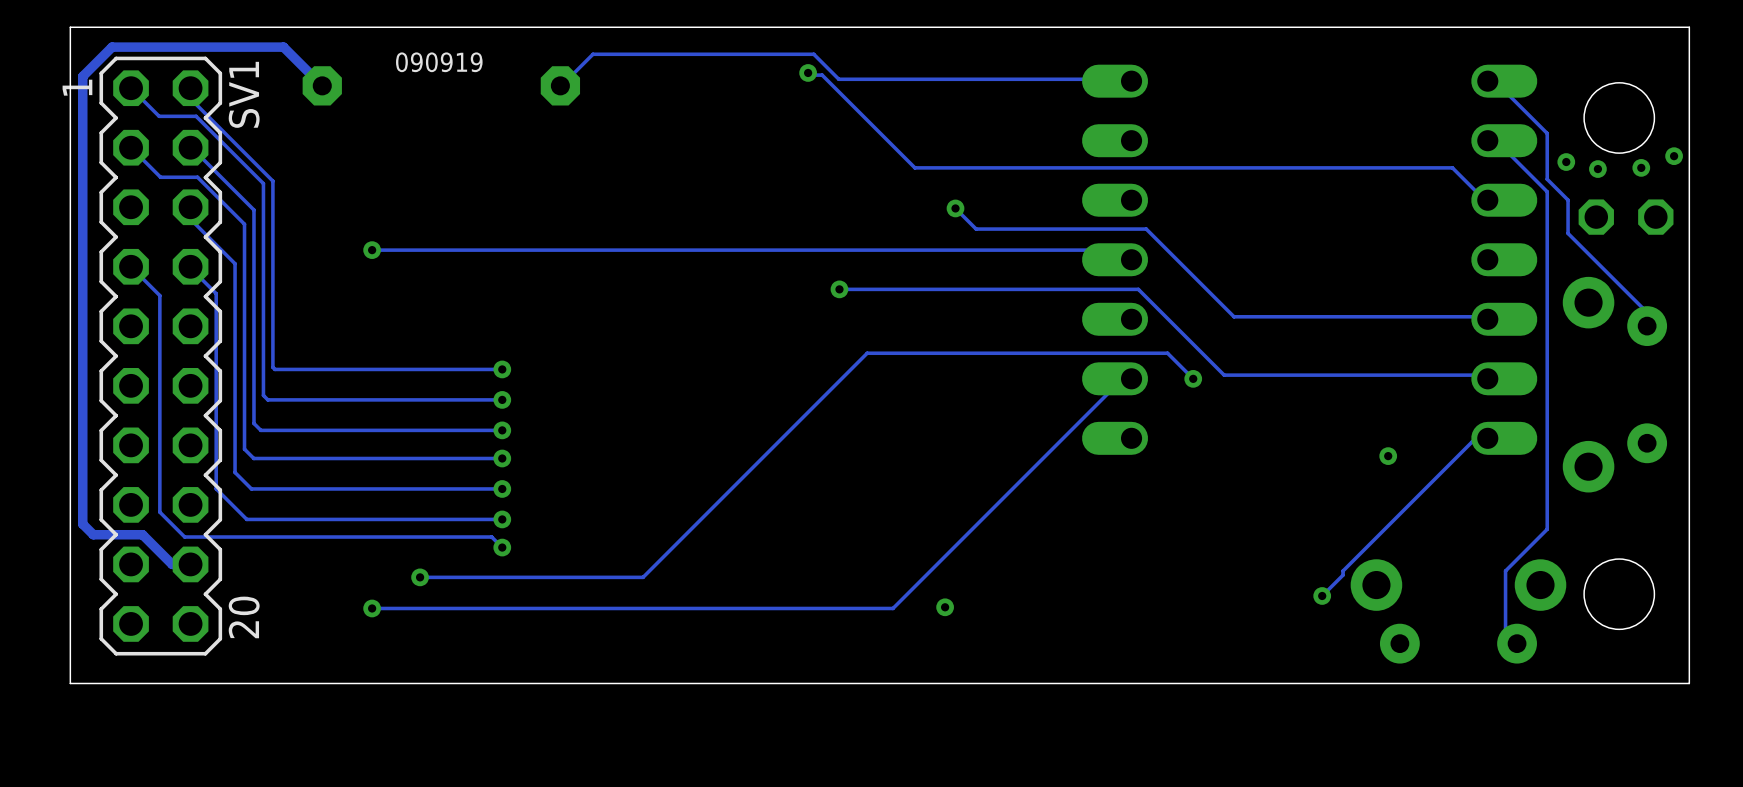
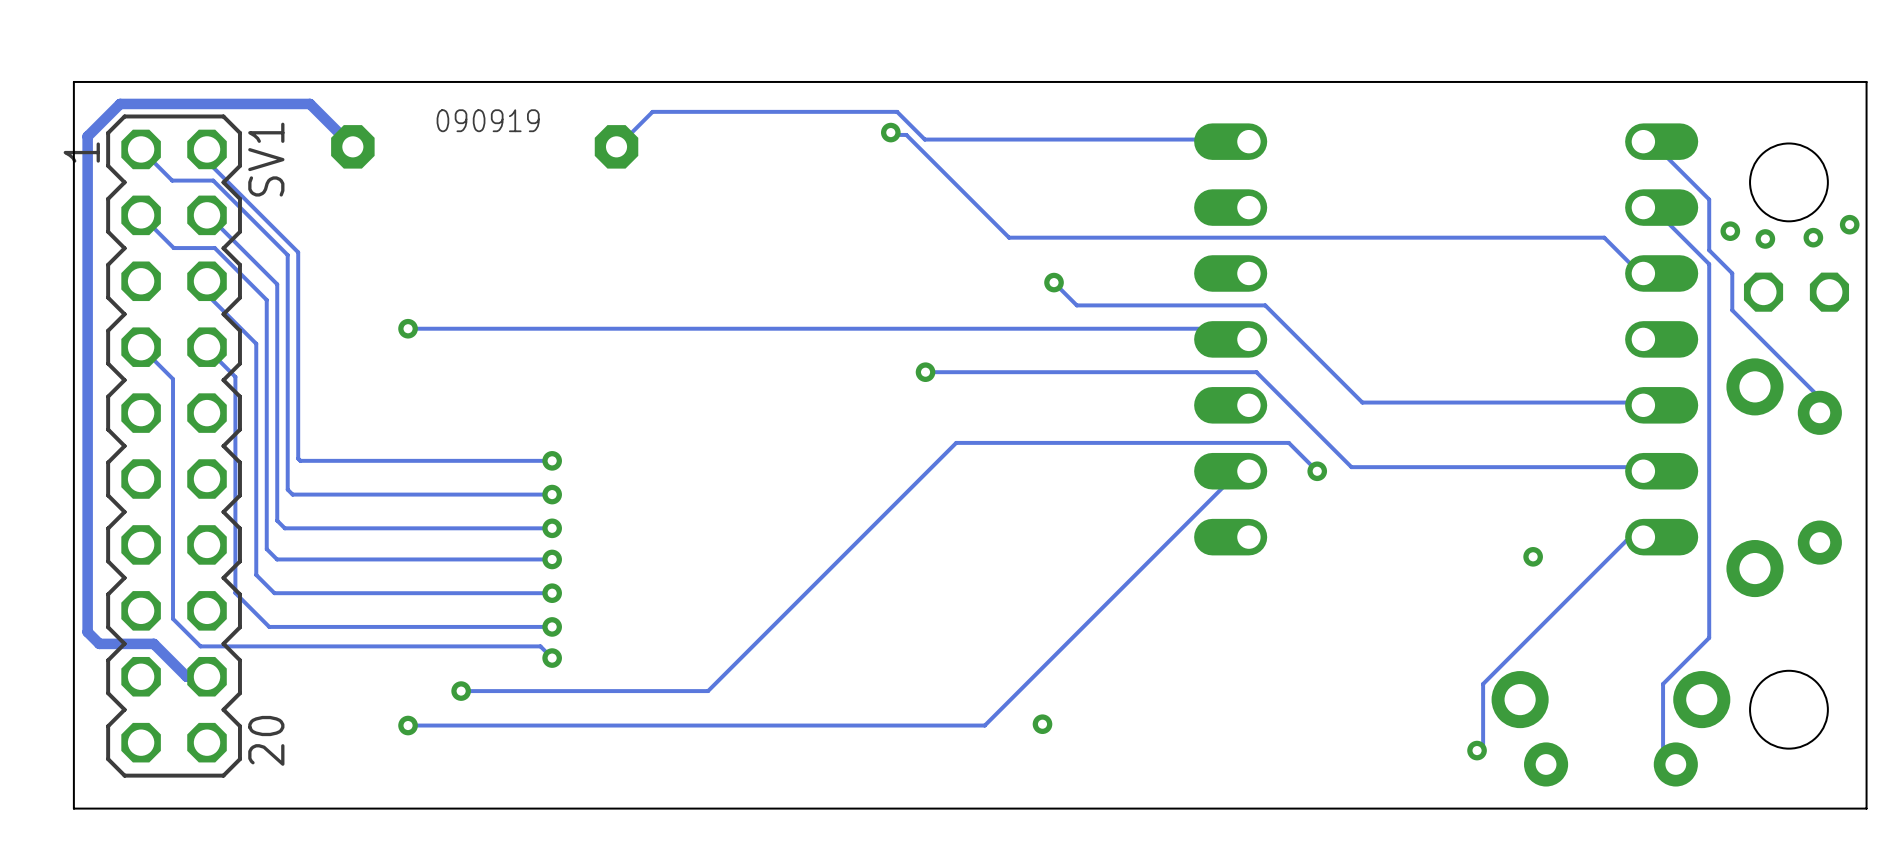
track: (1343, 575) (1322, 595) -> (1483, 688) (1483, 744) (1477, 750)
via position: (1322, 595) -> (1477, 750)

